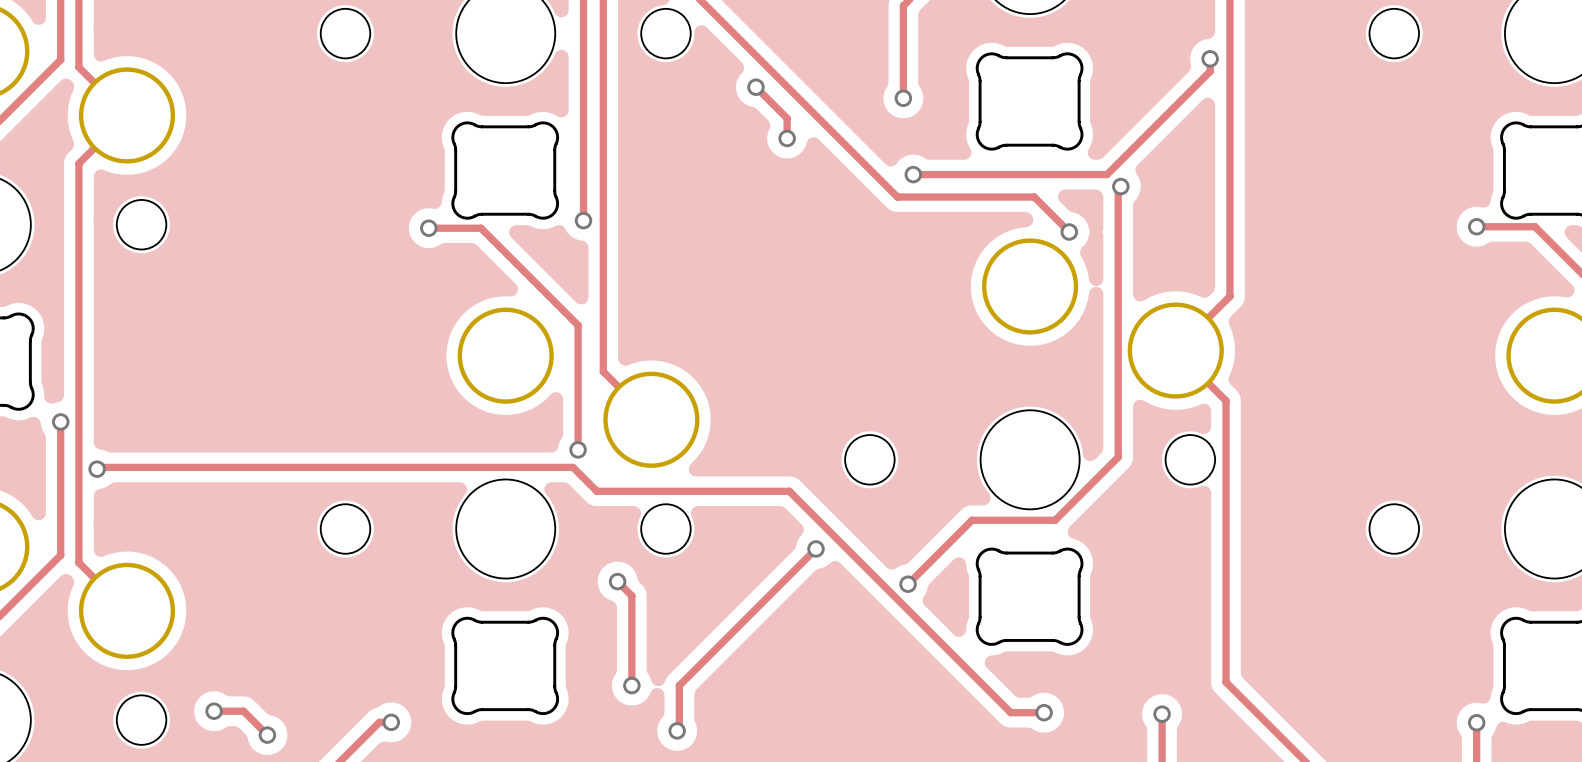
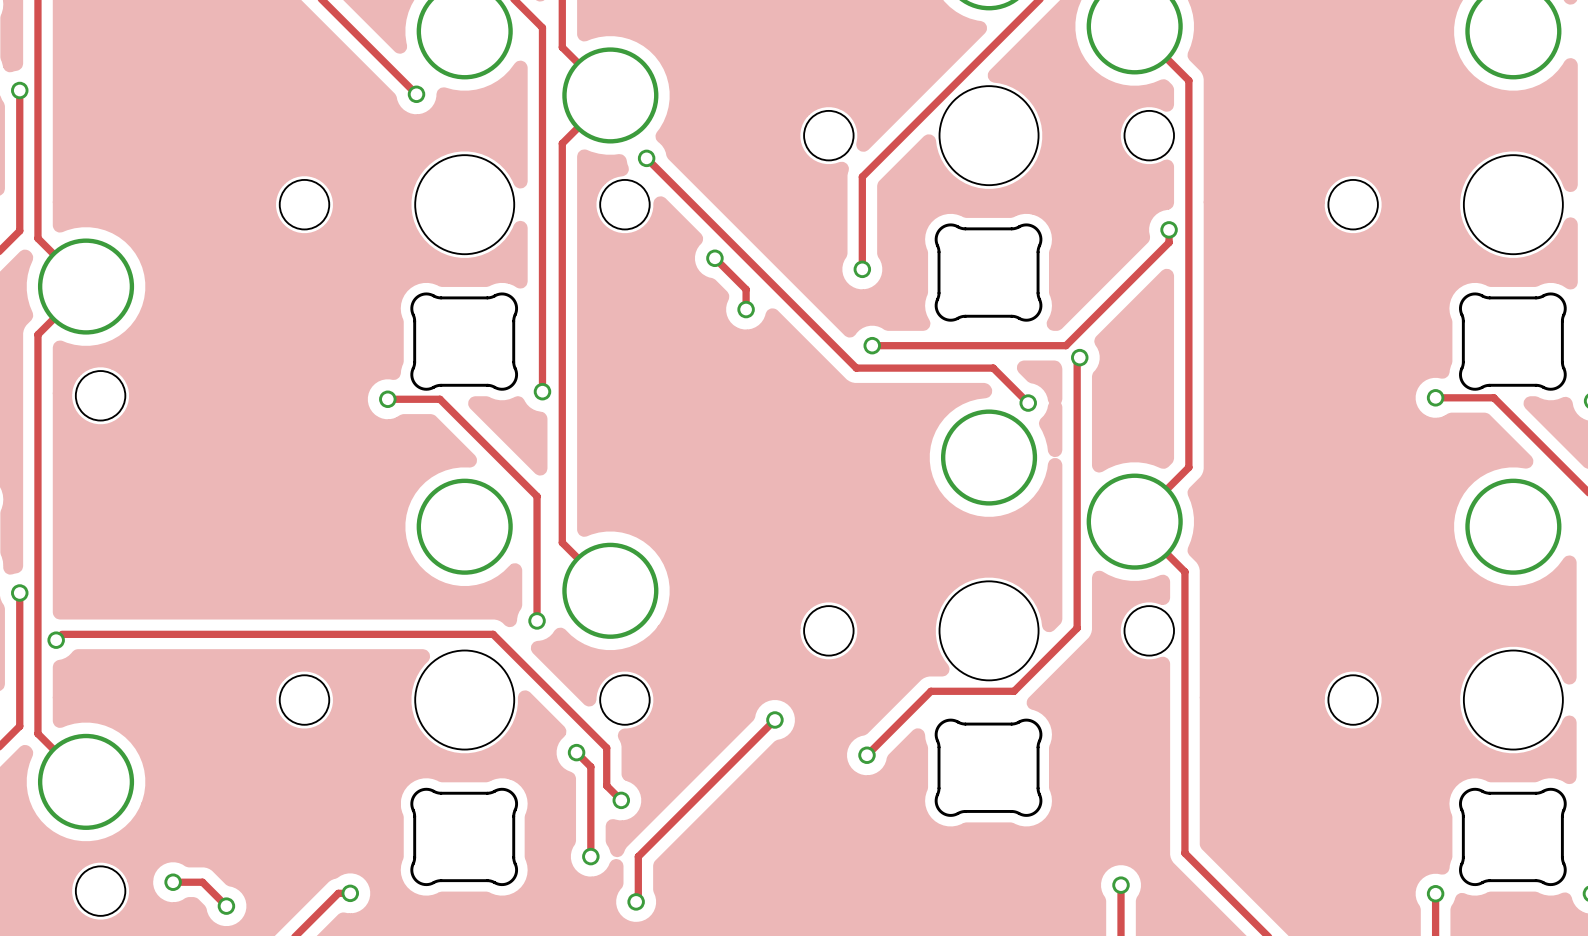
track: none -> (61, 634) (493, 634) (606, 747) (606, 785) (621, 800)
track: (98, 467) (573, 467) (596, 491) (789, 491) (1010, 712) (1044, 712) -> none
via: none -> (621, 800)
via: (1044, 712) -> none

